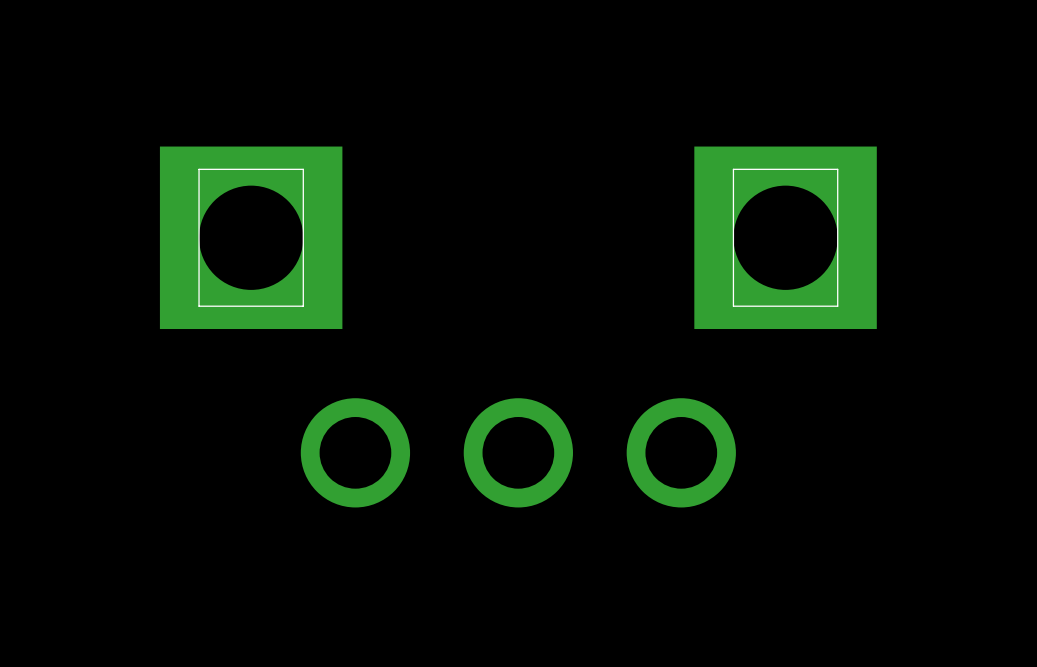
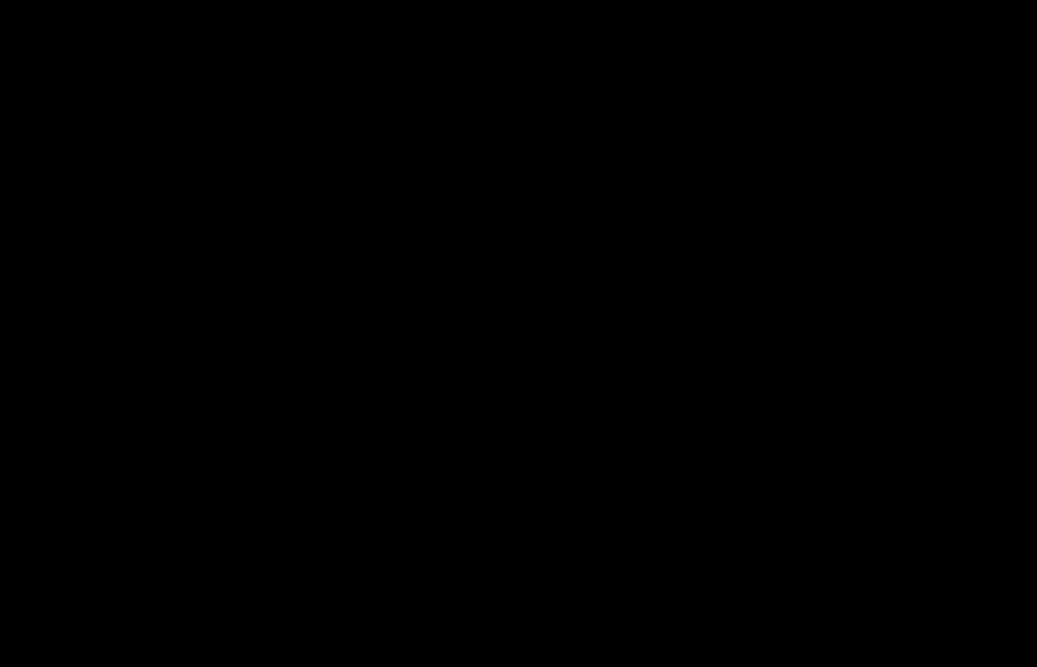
part: (518, 327) -> none

